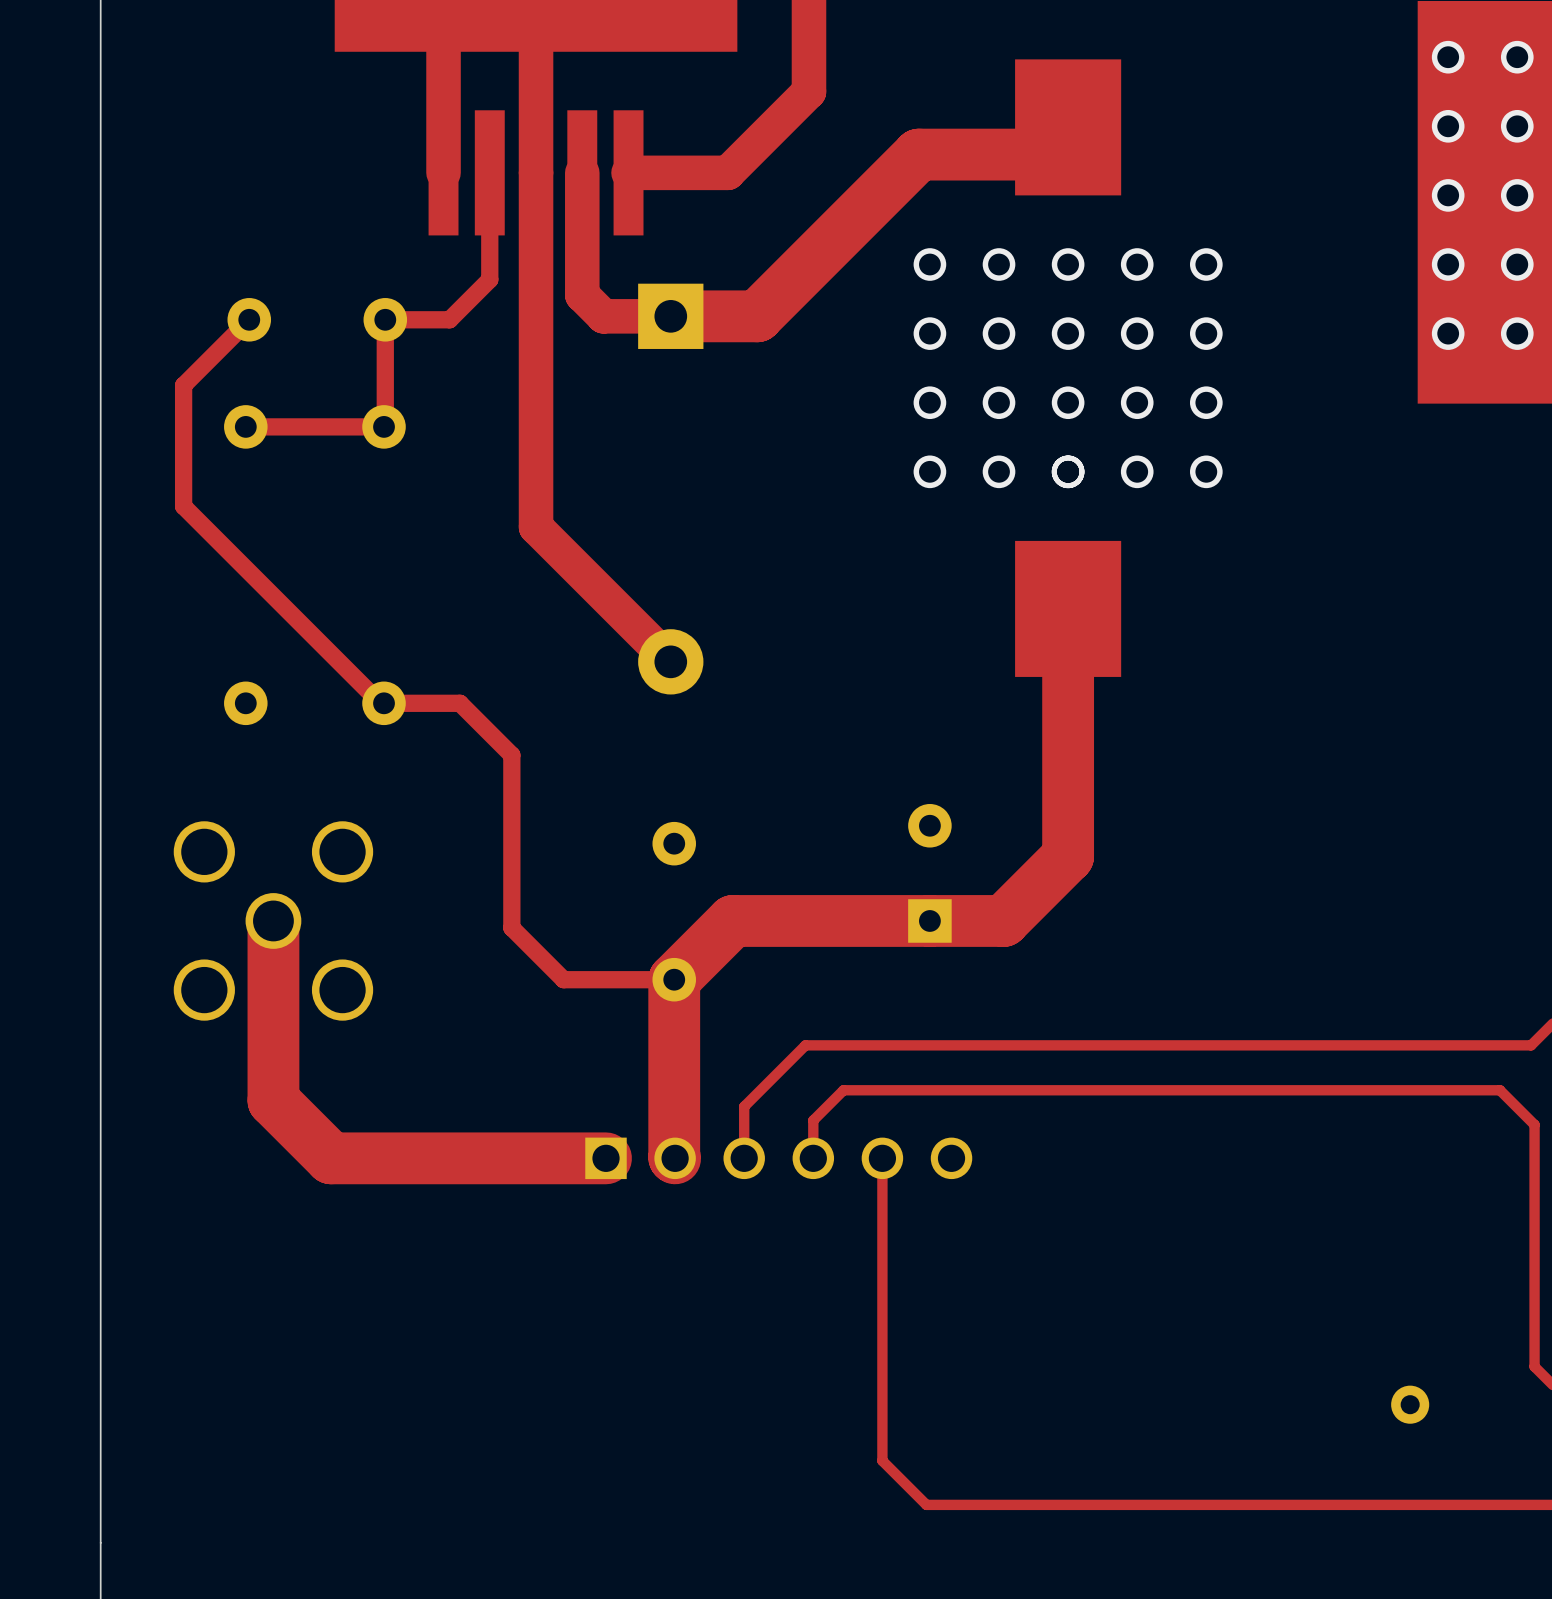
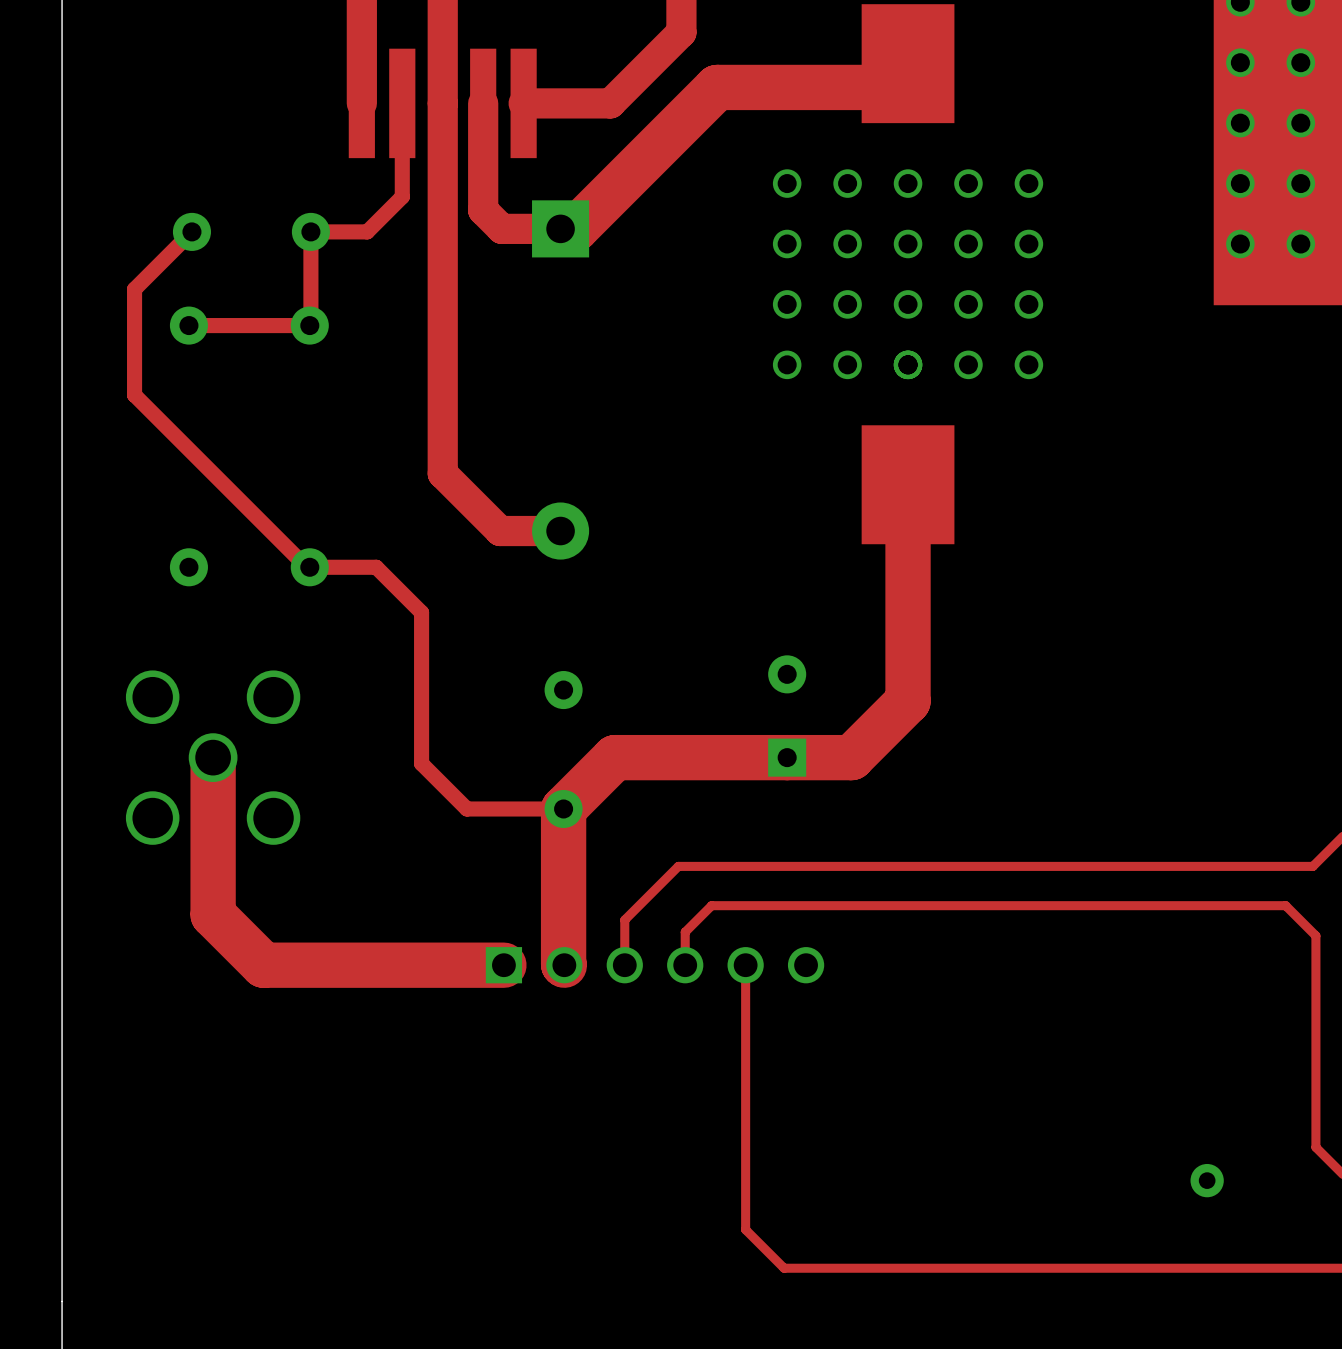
top track: (918, 154) (757, 316) (688, 316) -> (777, 87) (717, 87) (575, 228)
top track: (536, 527) (670, 661) -> (442, 413) (442, 473) (500, 531) (560, 531)

